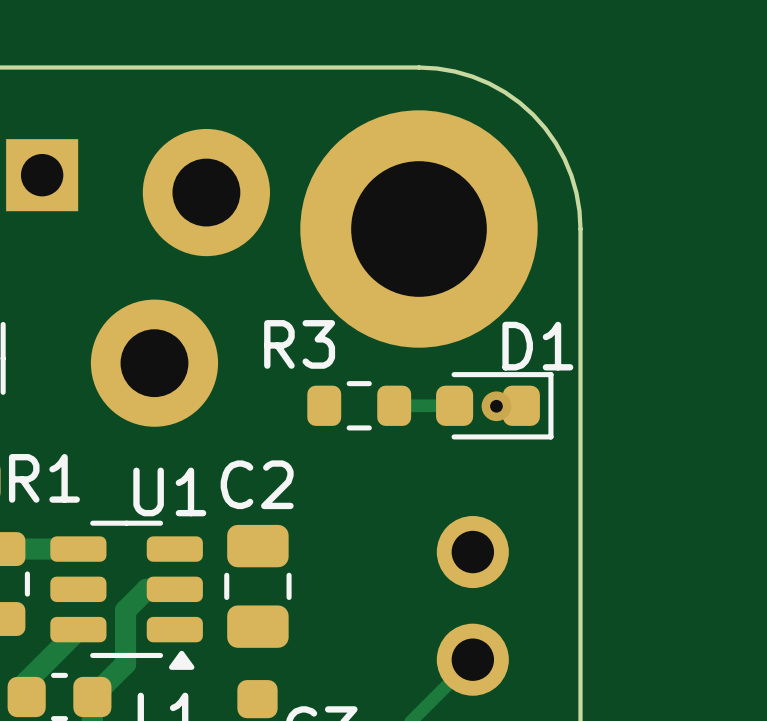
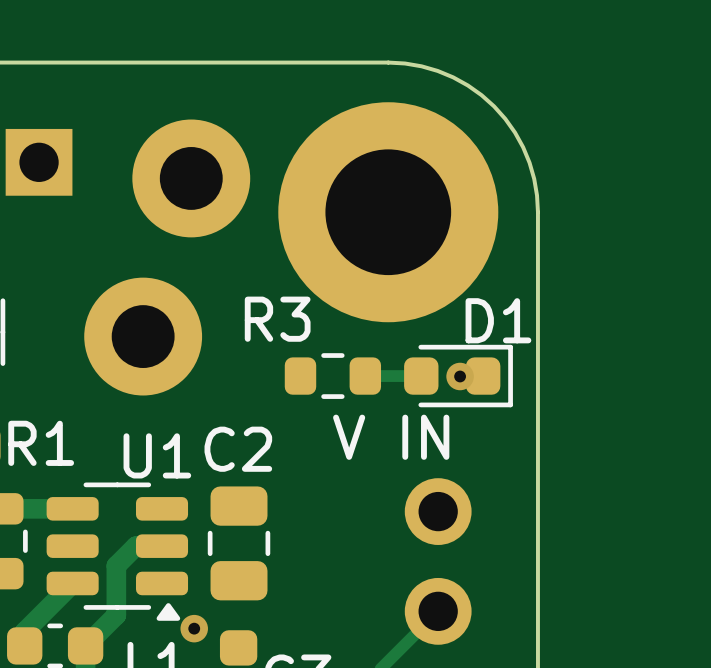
text: none -> V IN (391, 437)
via: none -> (194, 628)

